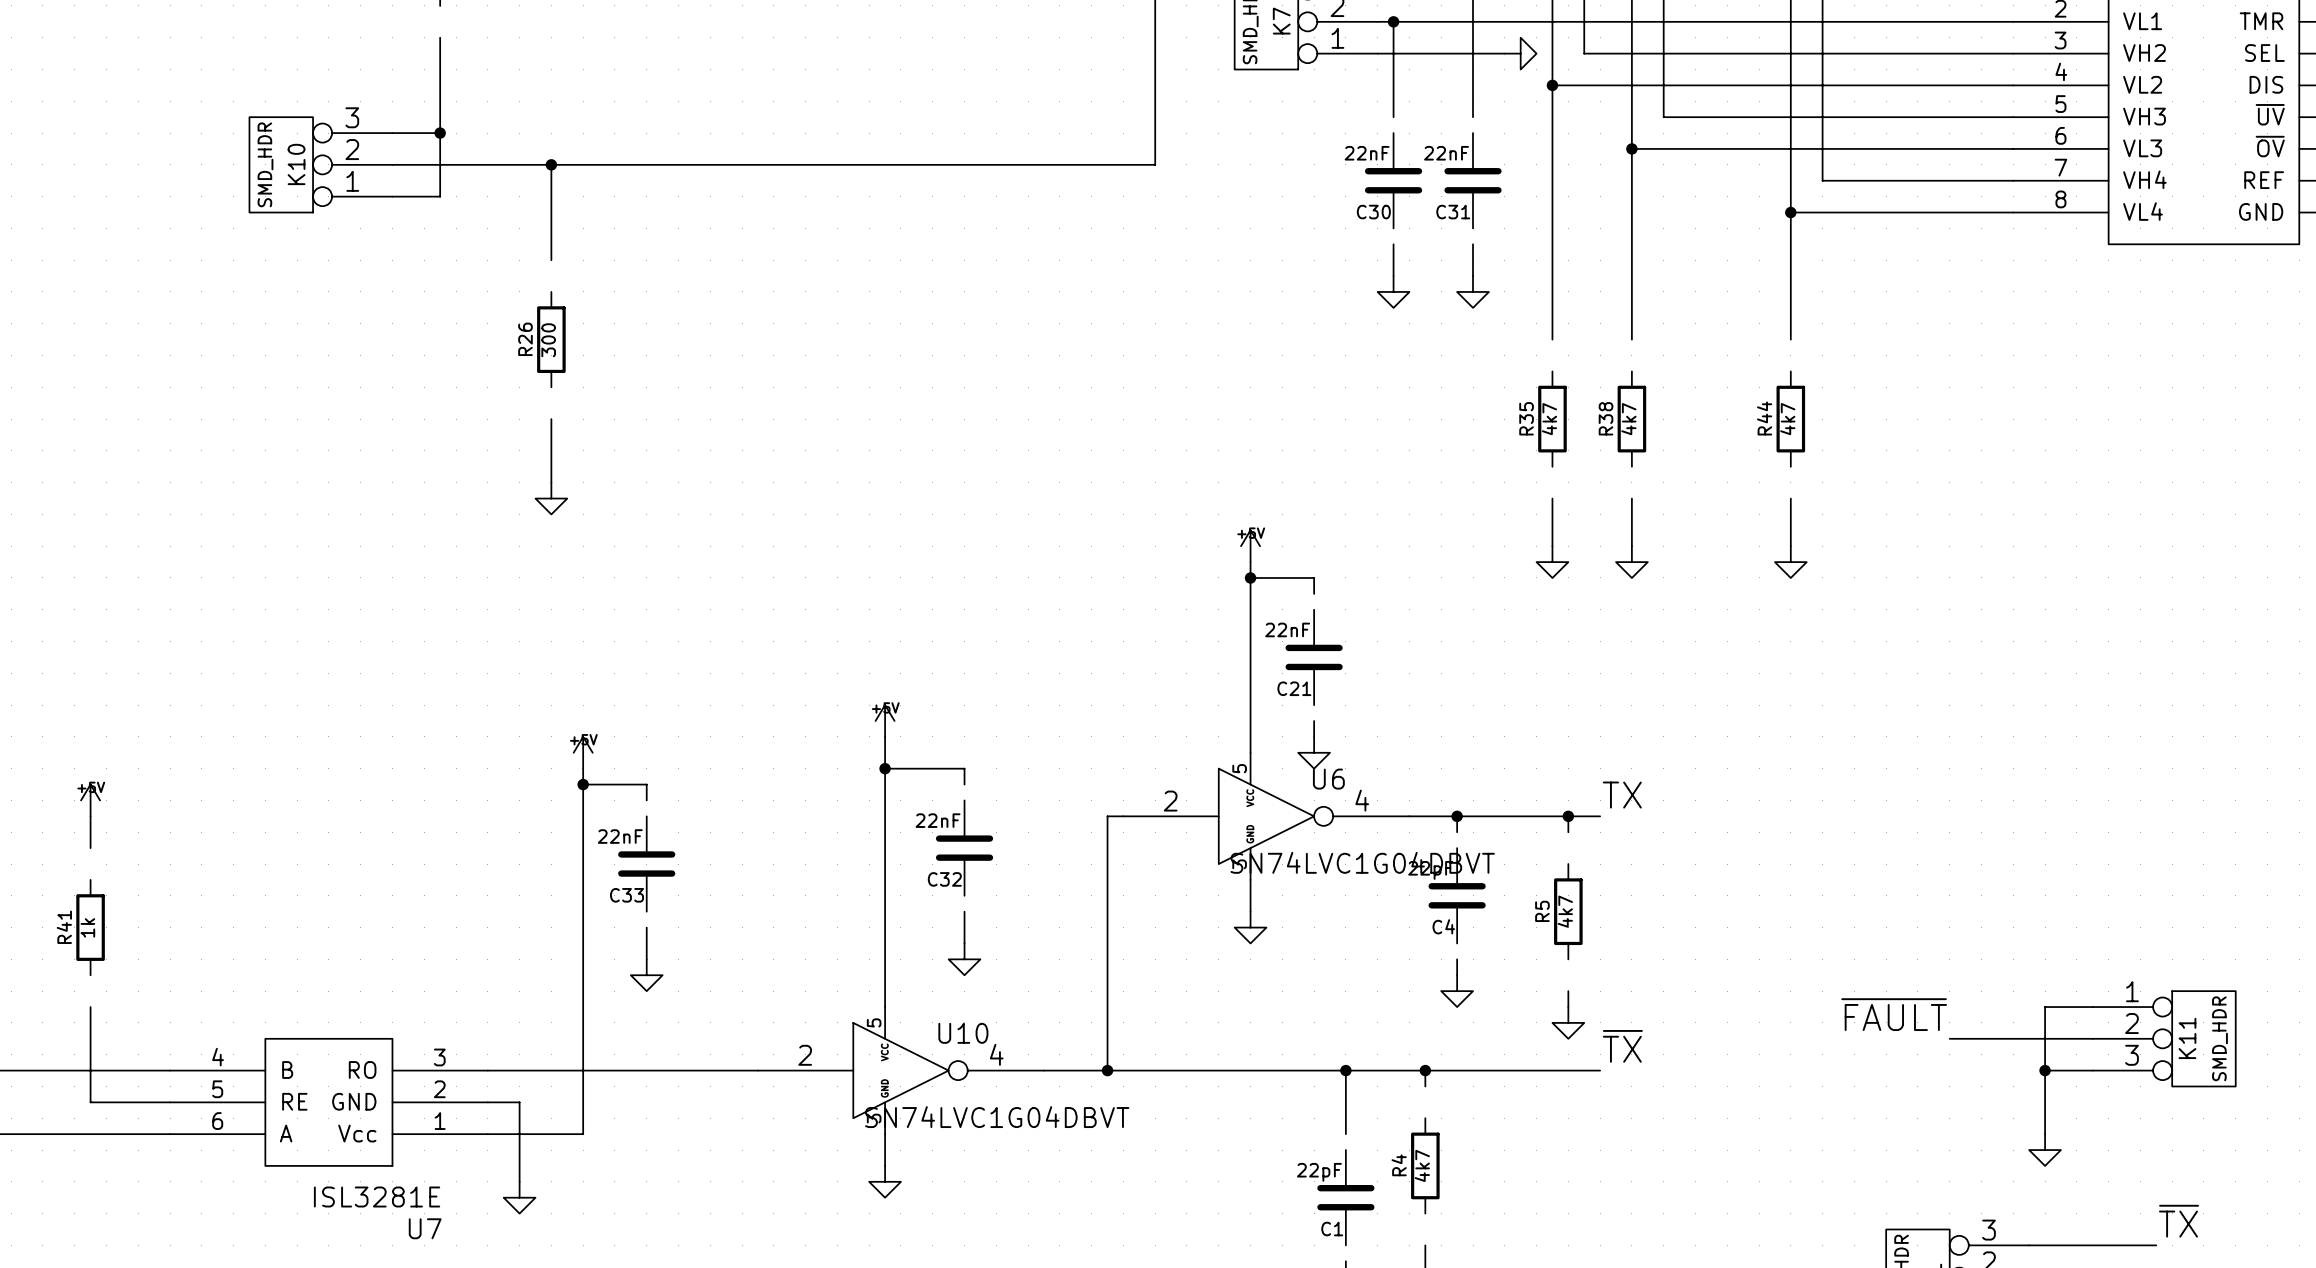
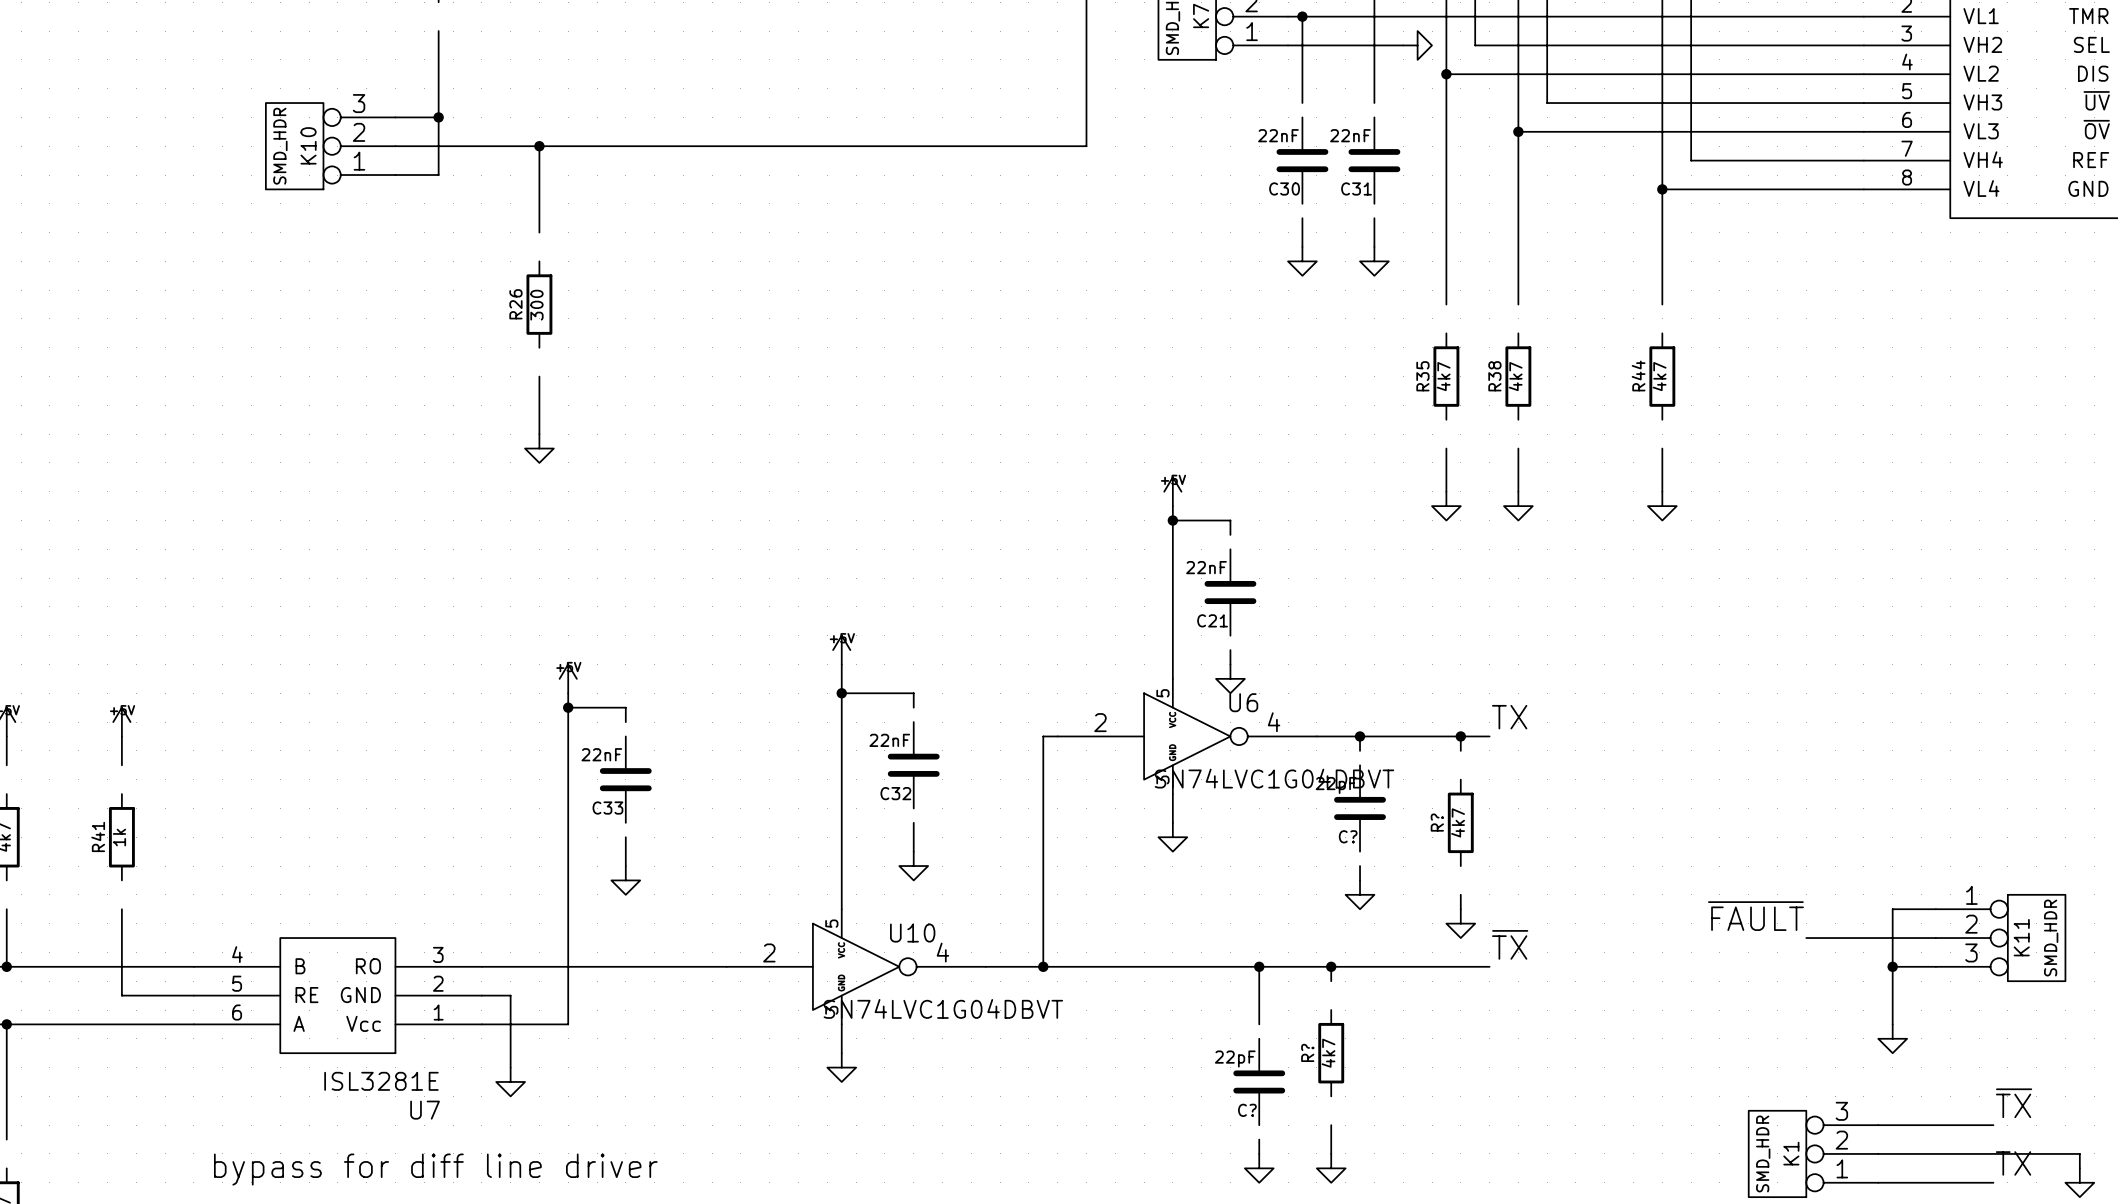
R5 name: R5 (1542, 911) -> R? (1437, 822)
C4 name: C4 (1443, 926) -> C? (1348, 836)
R4 name: R4 (1399, 1165) -> R? (1307, 1052)
C1 name: C1 (1332, 1229) -> C? (1247, 1110)

